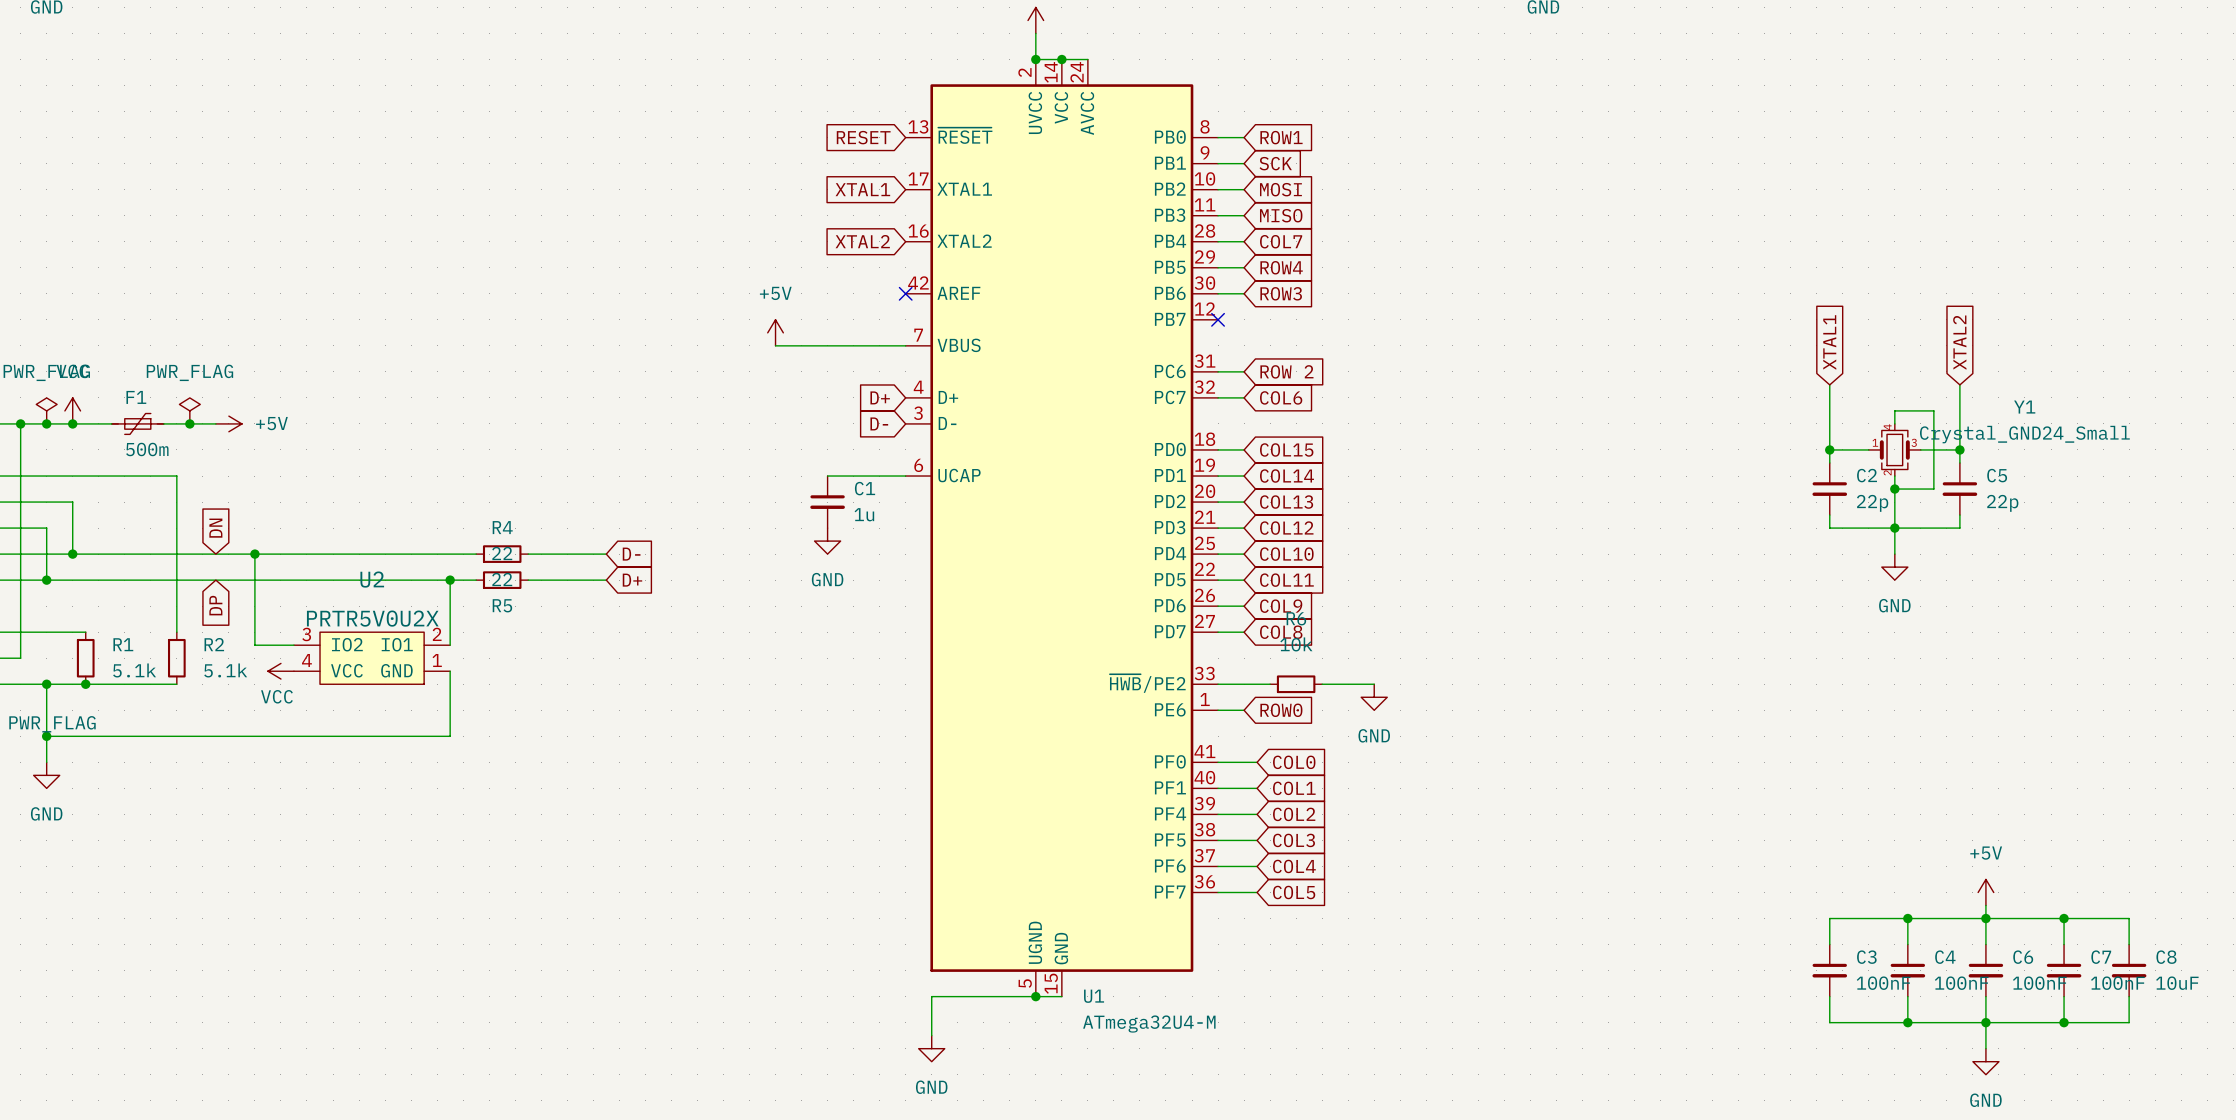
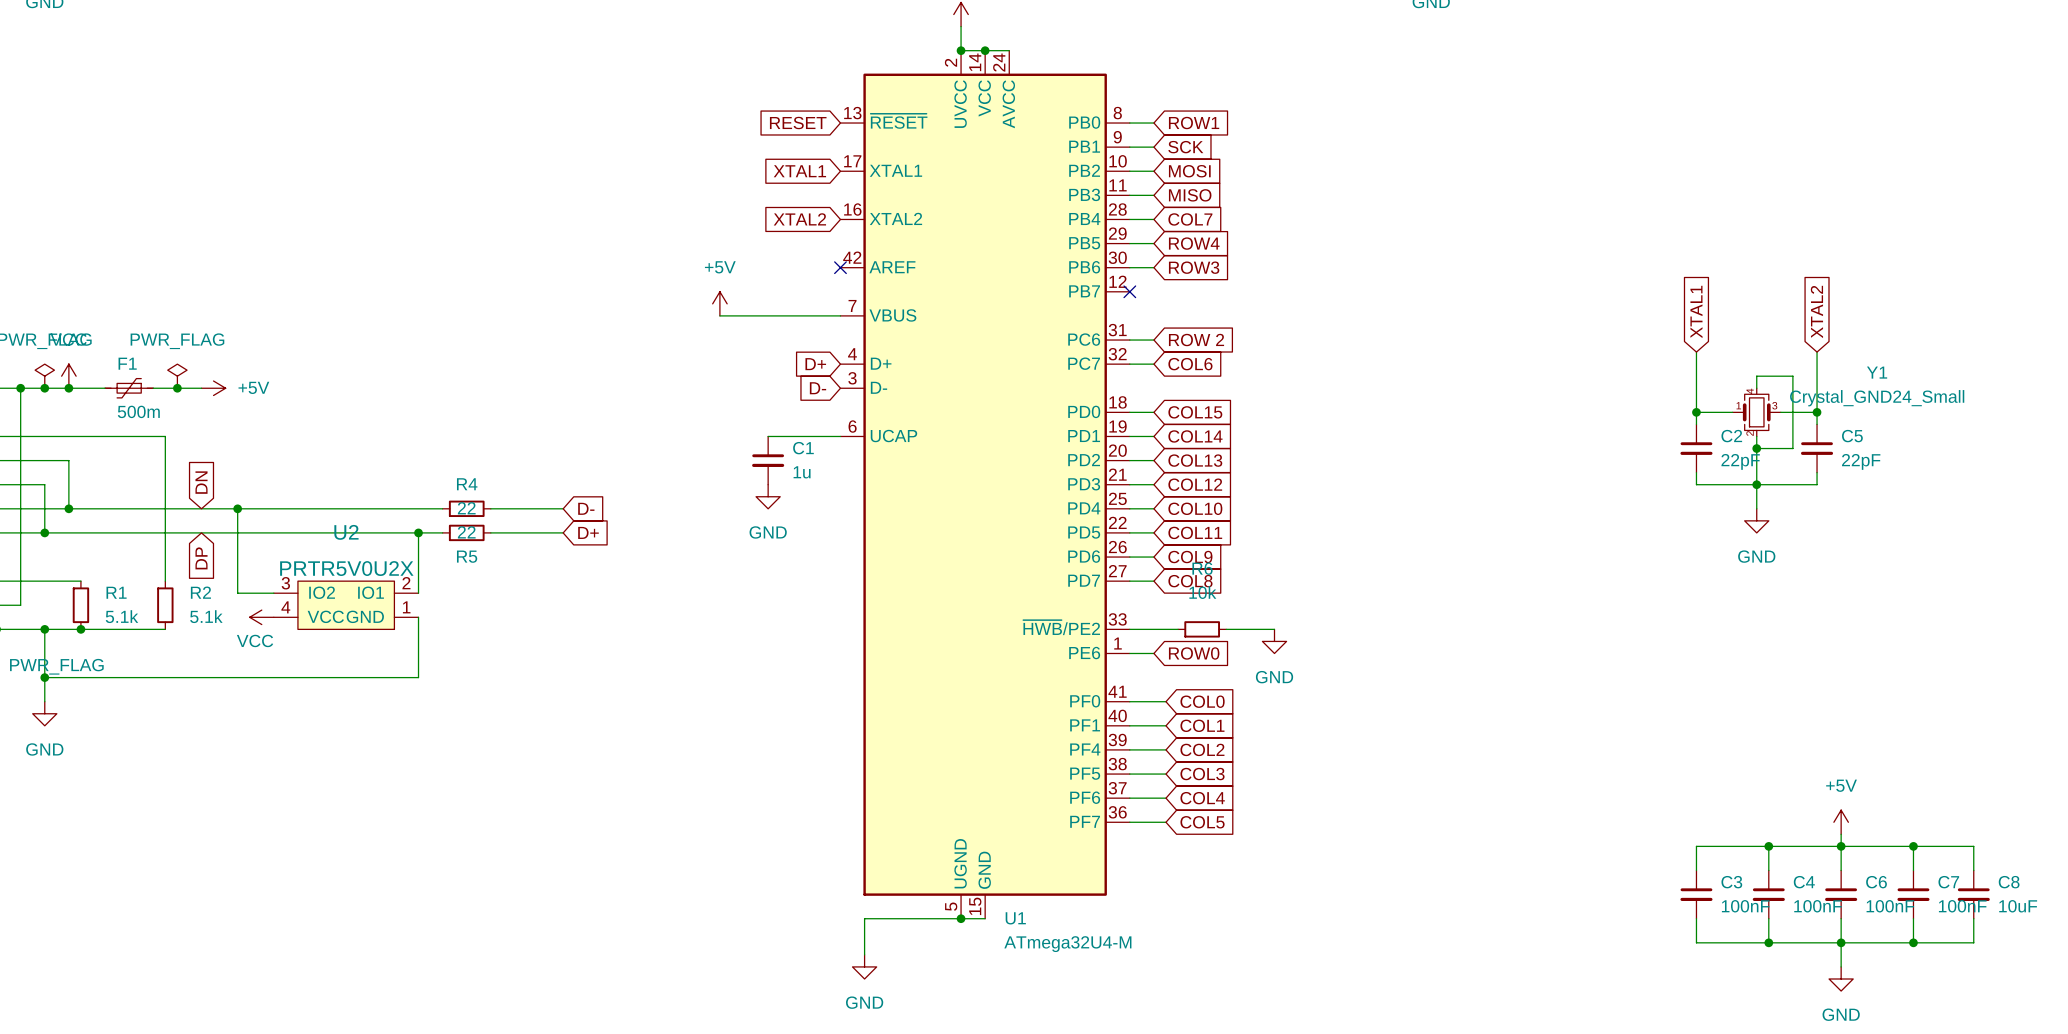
C2 value: 22p (1872, 503) -> 22pF (1740, 461)
C5 value: 22p (2002, 503) -> 22pF (1861, 461)

